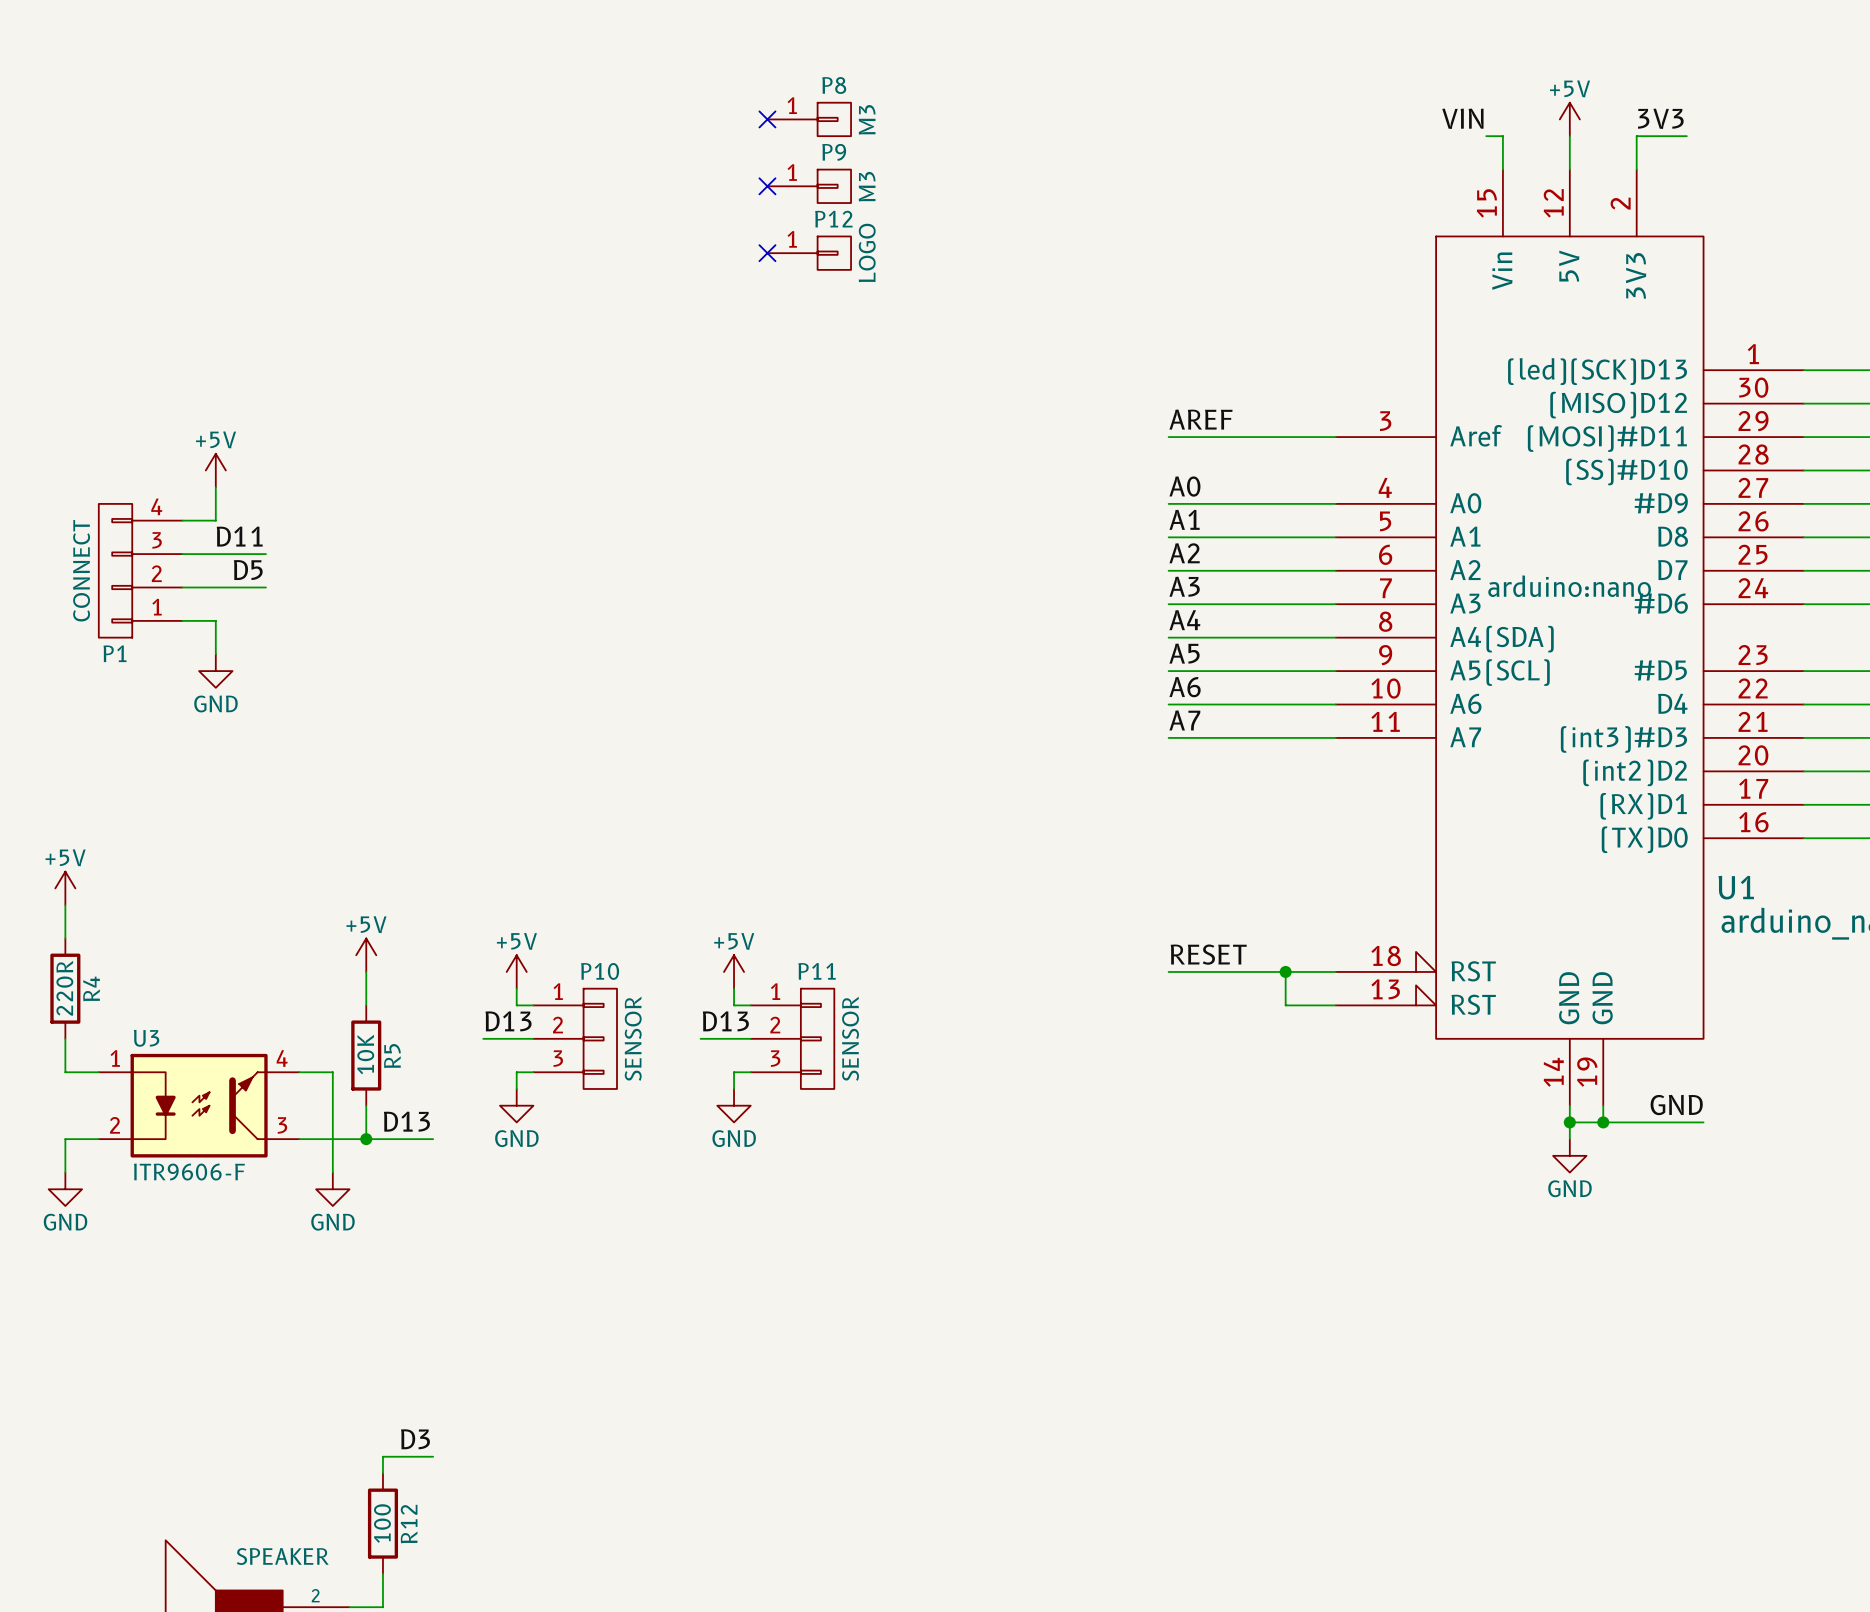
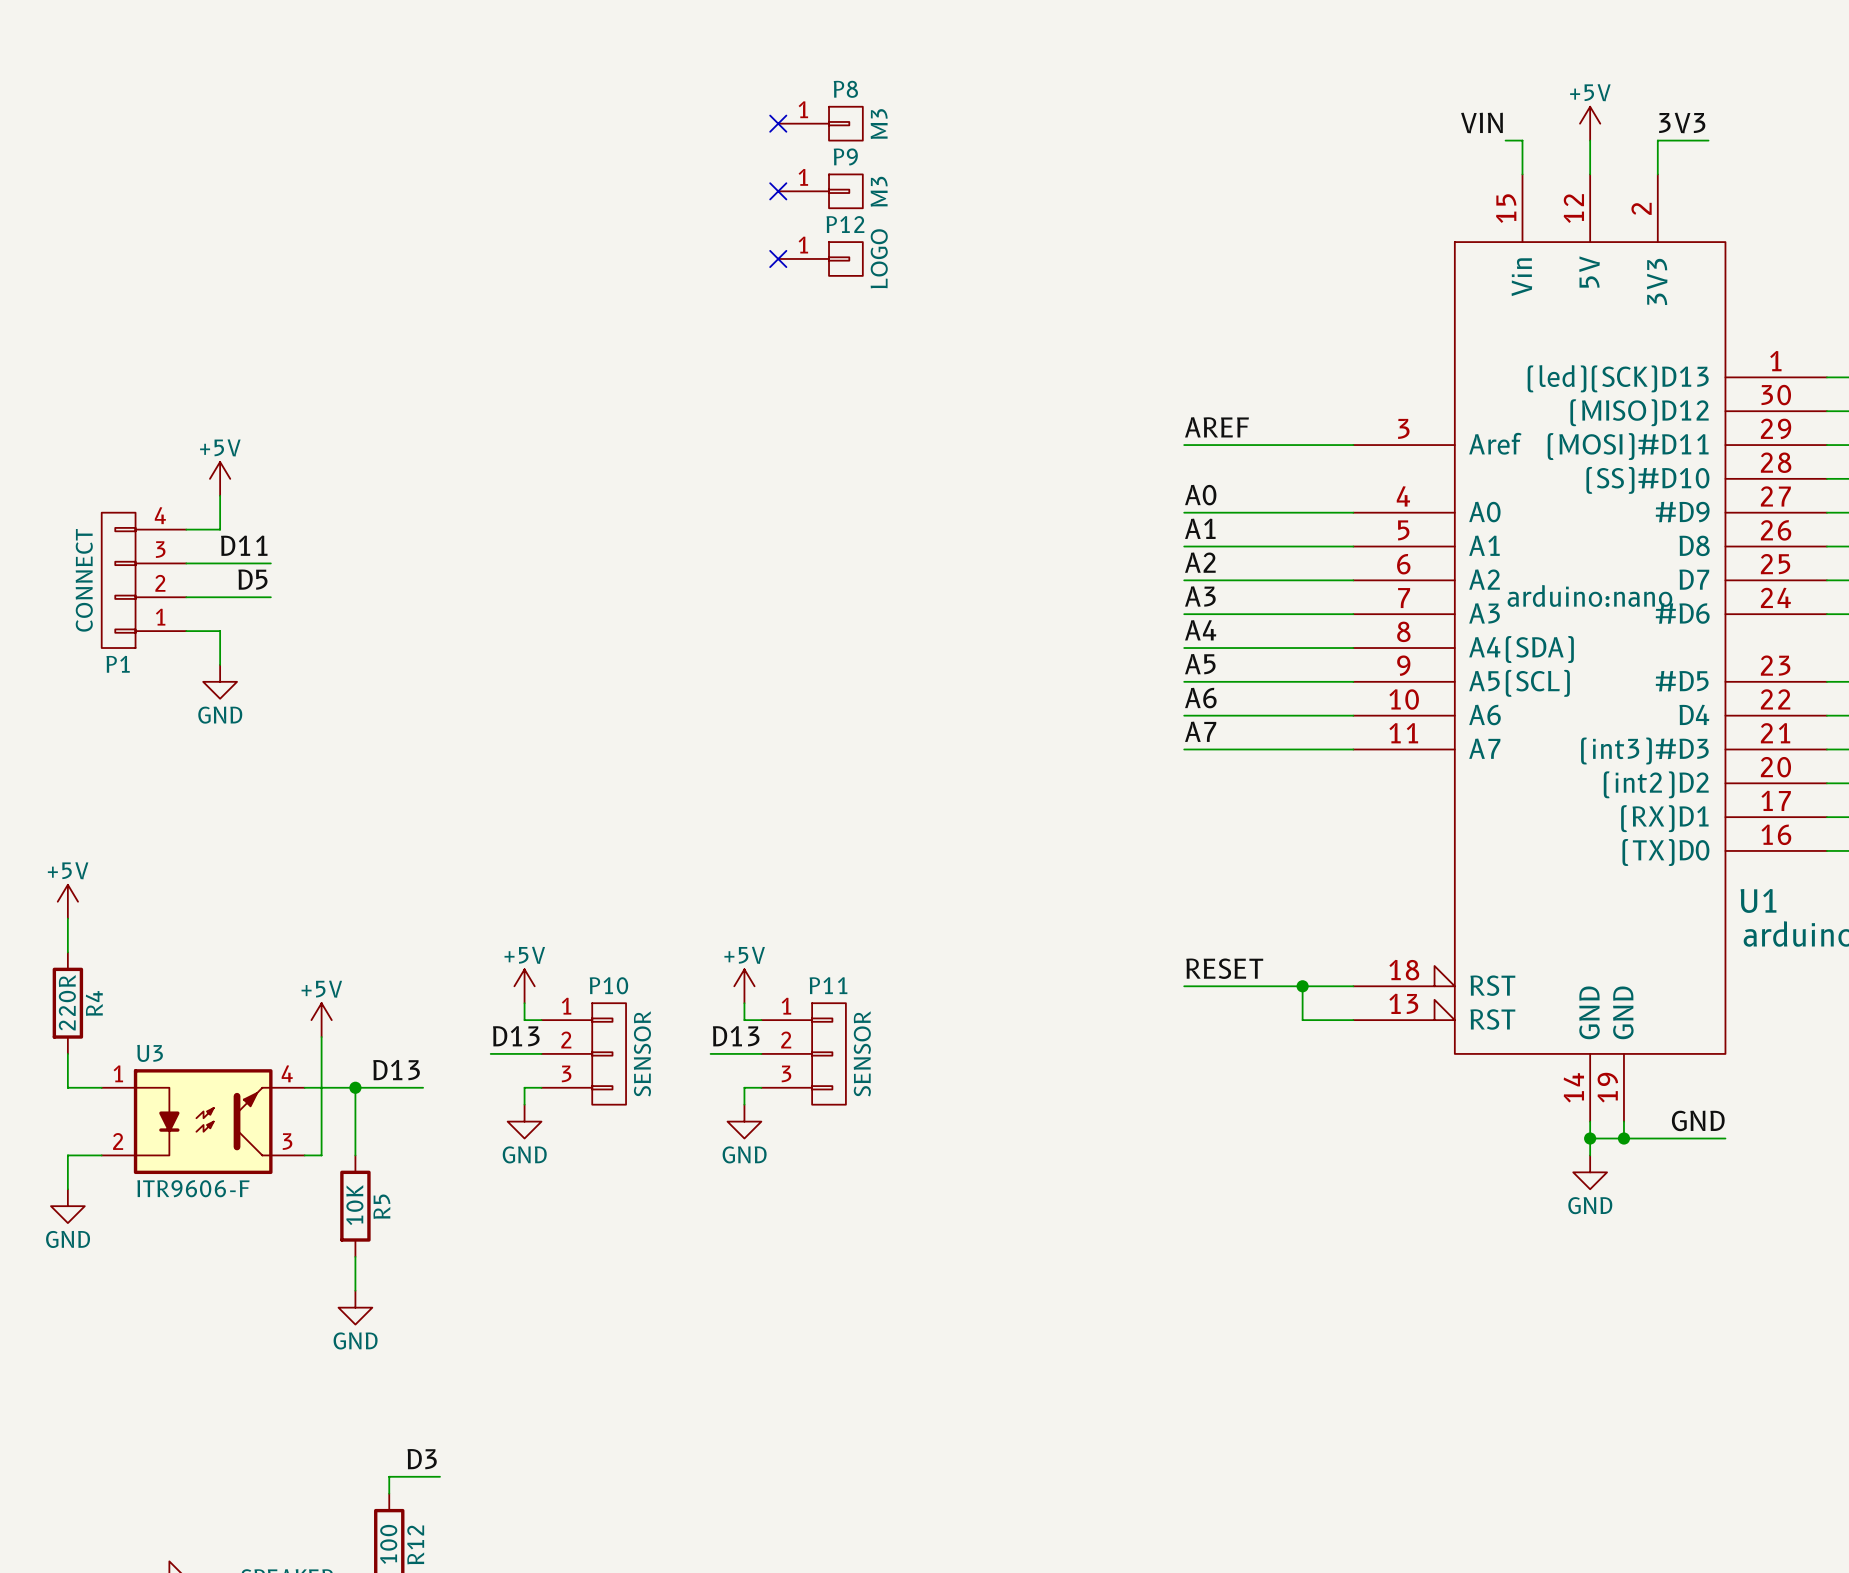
power symbol position: +5V (366, 955) -> +5V (321, 1020)
wire: (366, 971) (366, 1005) -> none
R5 position: (366, 1055) -> (355, 1206)
wire: (332, 1072) (332, 1172) -> (338, 1087) (423, 1087)
wire: none -> (355, 1087) (355, 1155)
wire: (366, 1105) (366, 1139) -> (355, 1256) (355, 1290)
label position: D13 (406, 1121) -> D13 (396, 1070)
wire: (316, 1139) (433, 1139) -> (321, 1155) (321, 1037)
junction position: (366, 1139) -> (355, 1087)
power symbol position: GND (332, 1189) -> GND (355, 1307)

